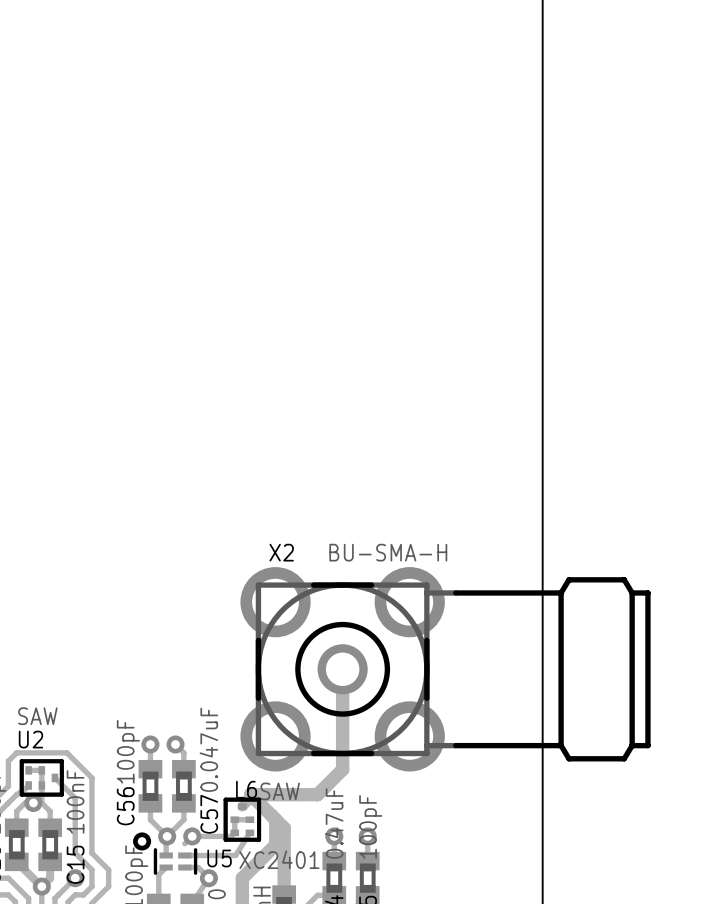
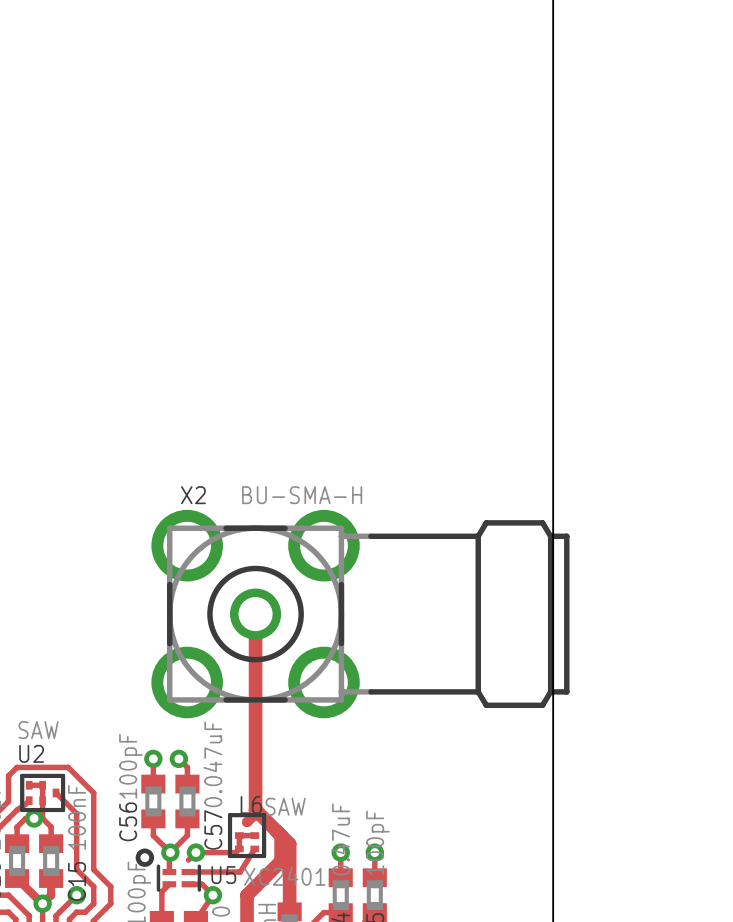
X2 footprint: [240, 567, 651, 772] -> [151, 509, 570, 719]
track: (342, 669) (342, 769) (317, 794) (250, 794) -> (255, 614) (255, 810)

